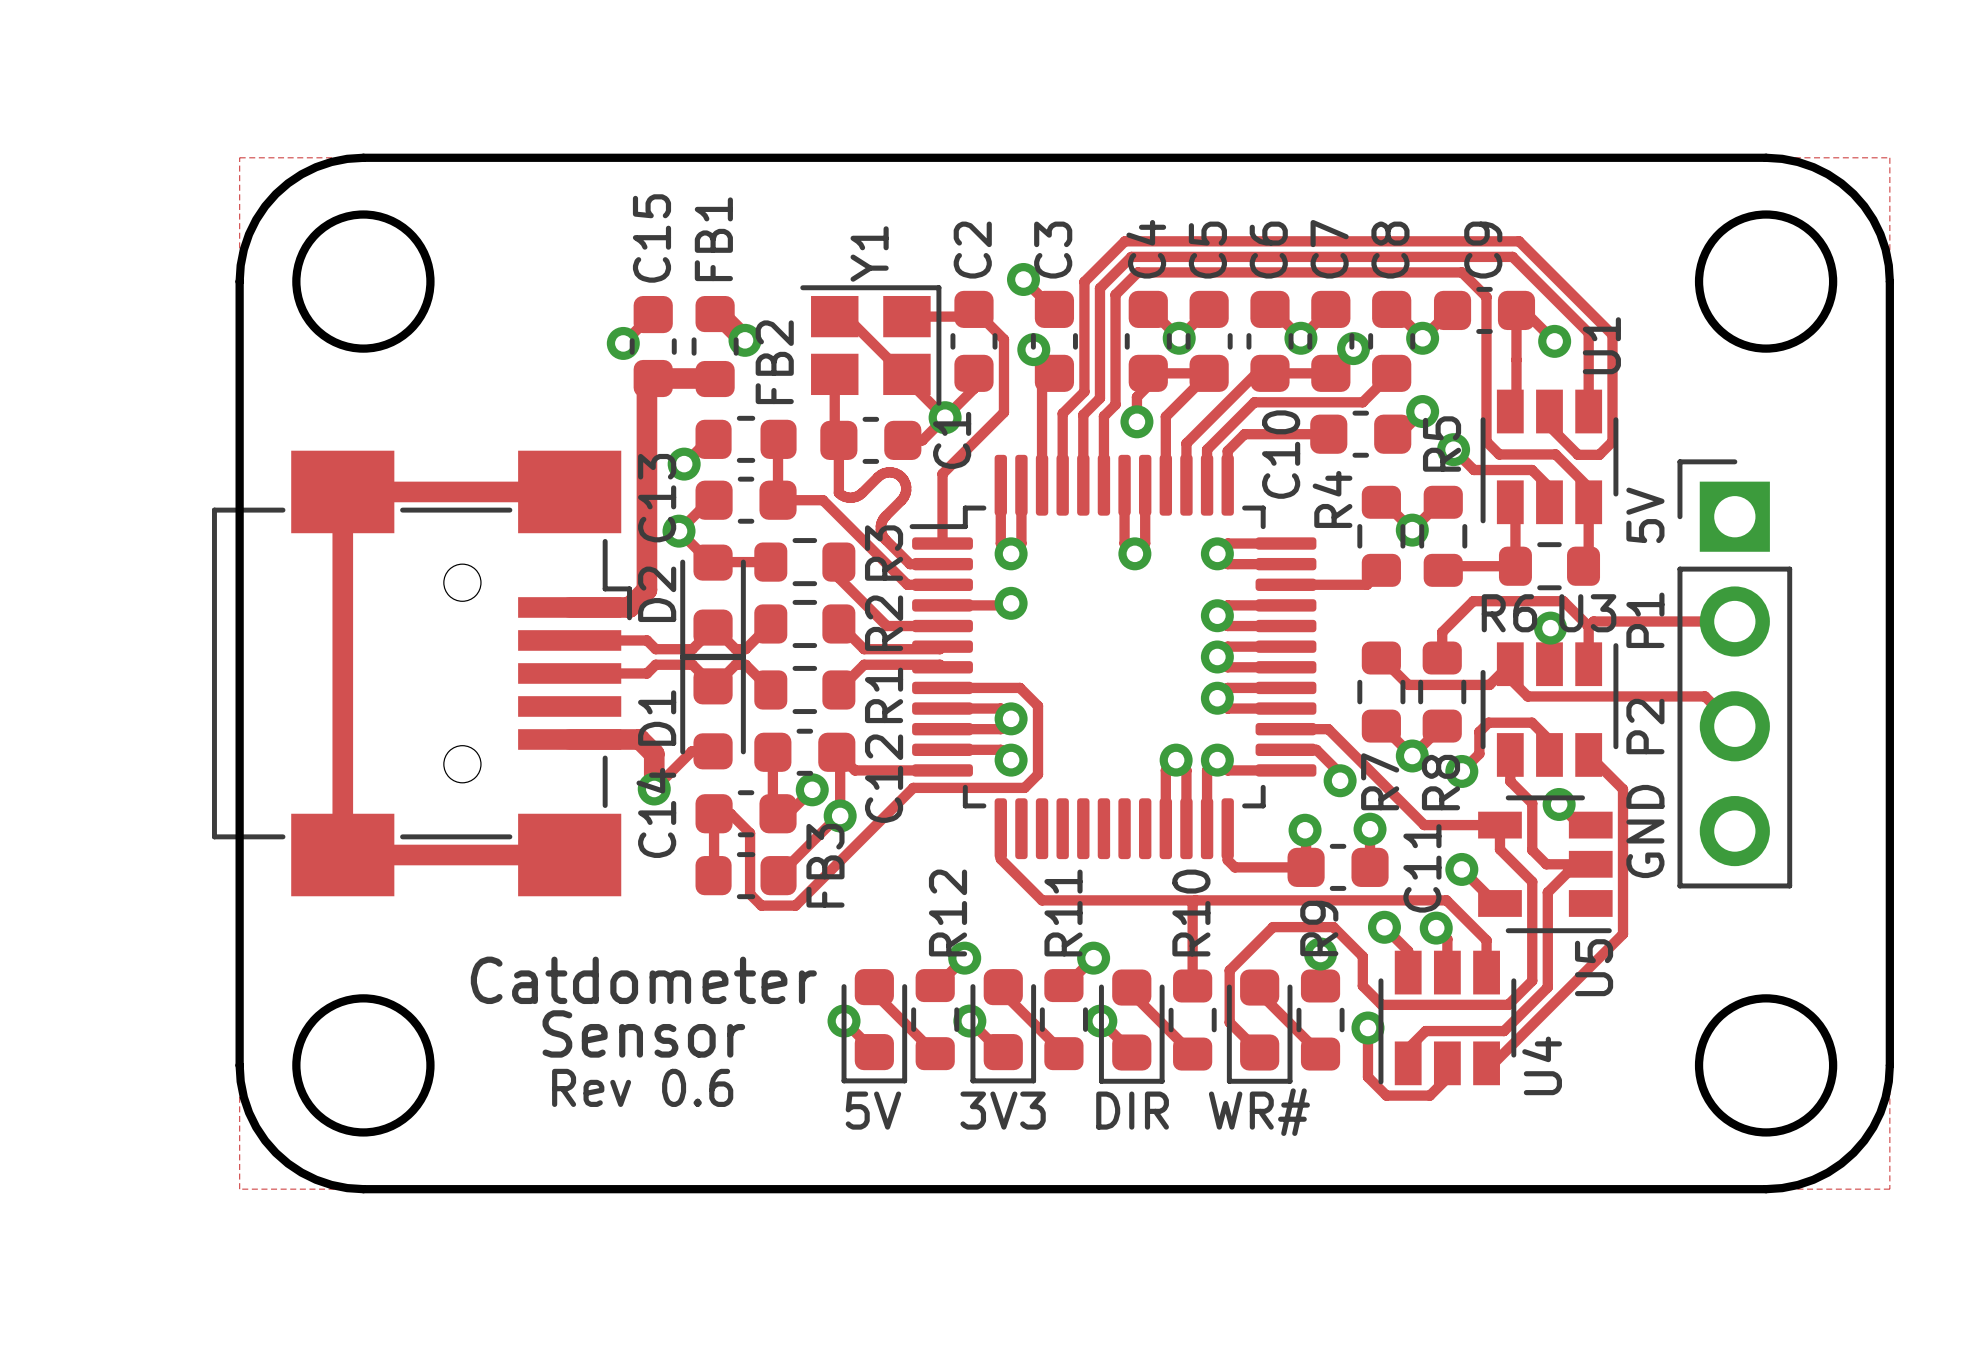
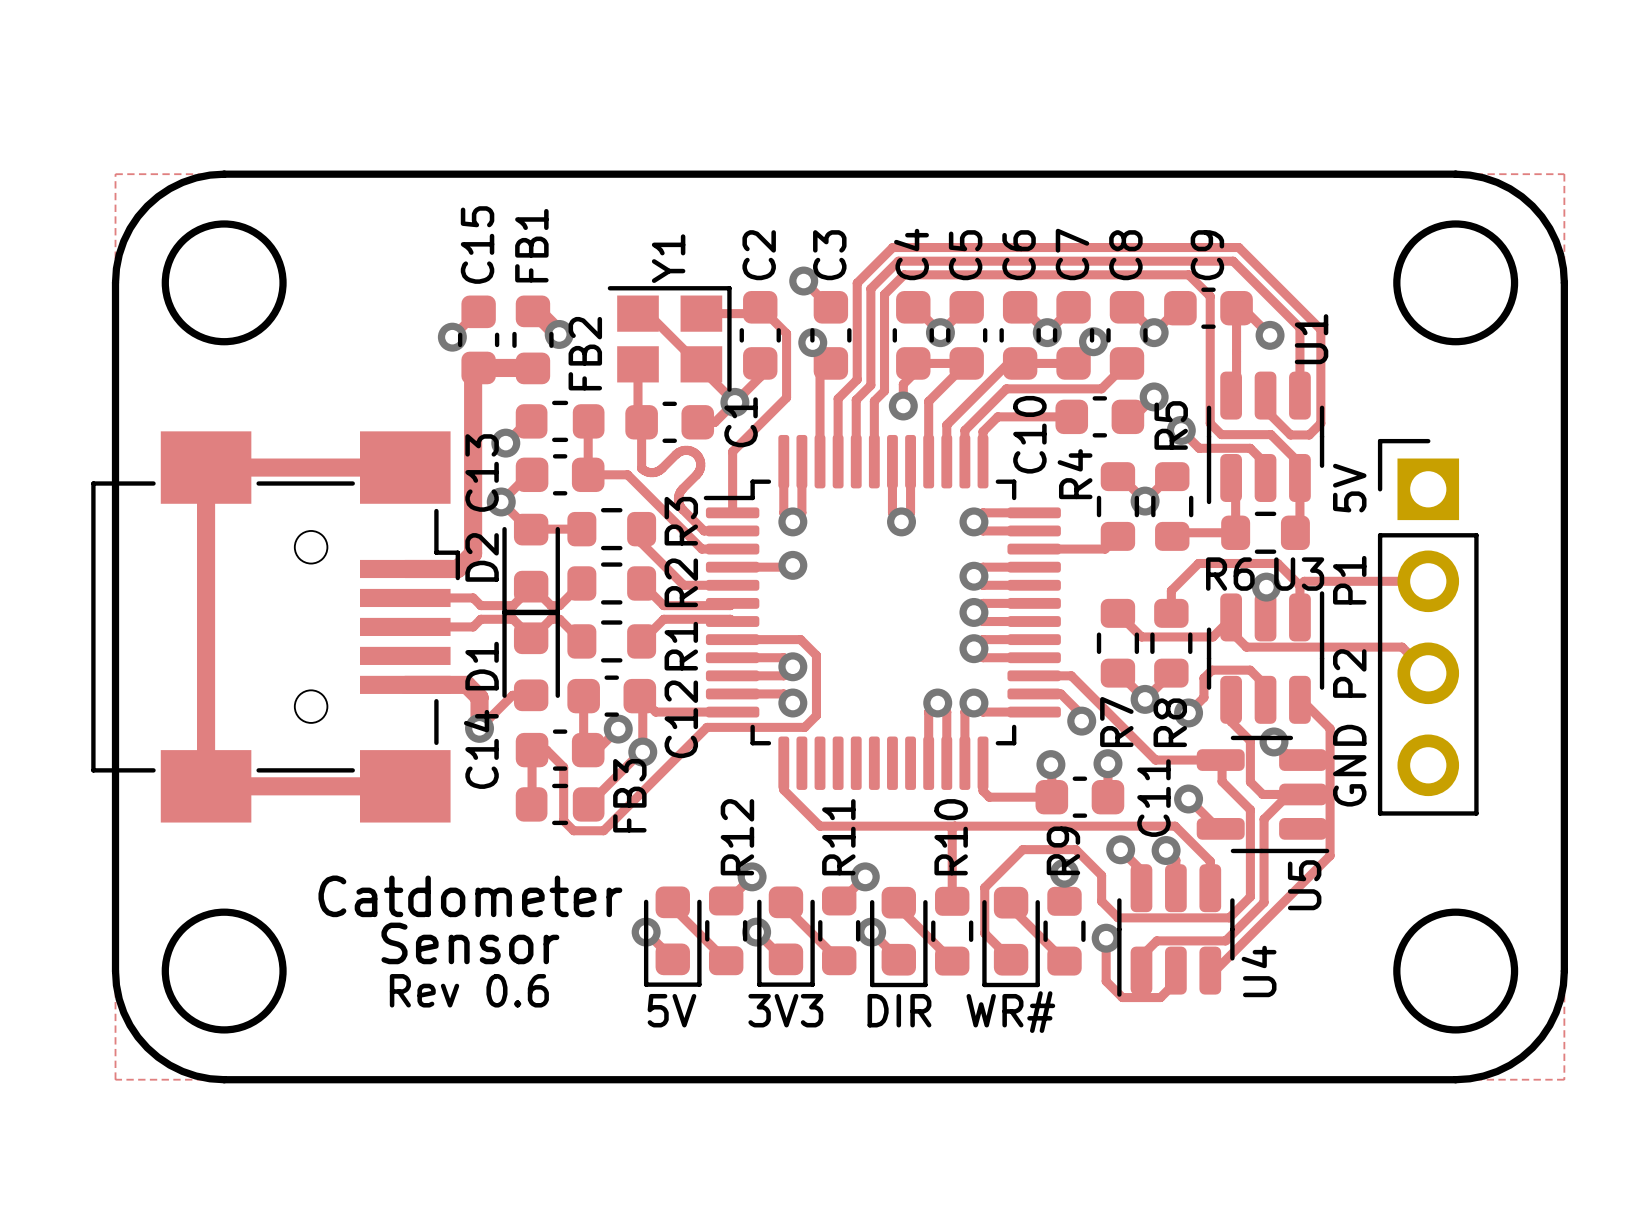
U1 footprint: [1480, 389, 1619, 525] -> [1206, 371, 1325, 505]
U3 footprint: [1480, 642, 1619, 777] -> [1206, 591, 1325, 724]
U5 footprint: [1478, 795, 1613, 934] -> [1196, 735, 1330, 854]
U4 footprint: [1378, 950, 1517, 1086] -> [1117, 864, 1235, 997]

